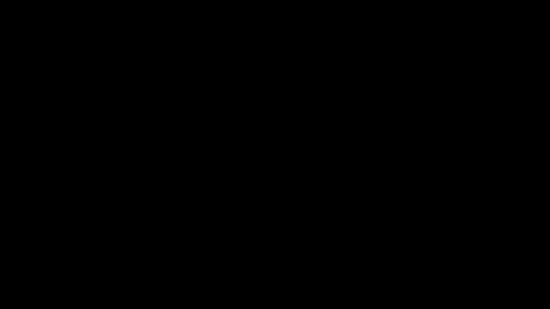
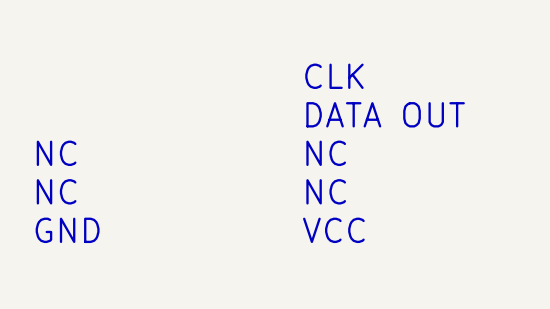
text: none -> CLK (334, 76)
text: none -> DATA OUT (385, 114)
text: none -> NC (56, 153)
text: none -> NC (326, 153)
text: none -> NC (56, 191)
text: none -> NC (326, 191)
text: none -> GND (67, 230)
text: none -> VCC (333, 230)

